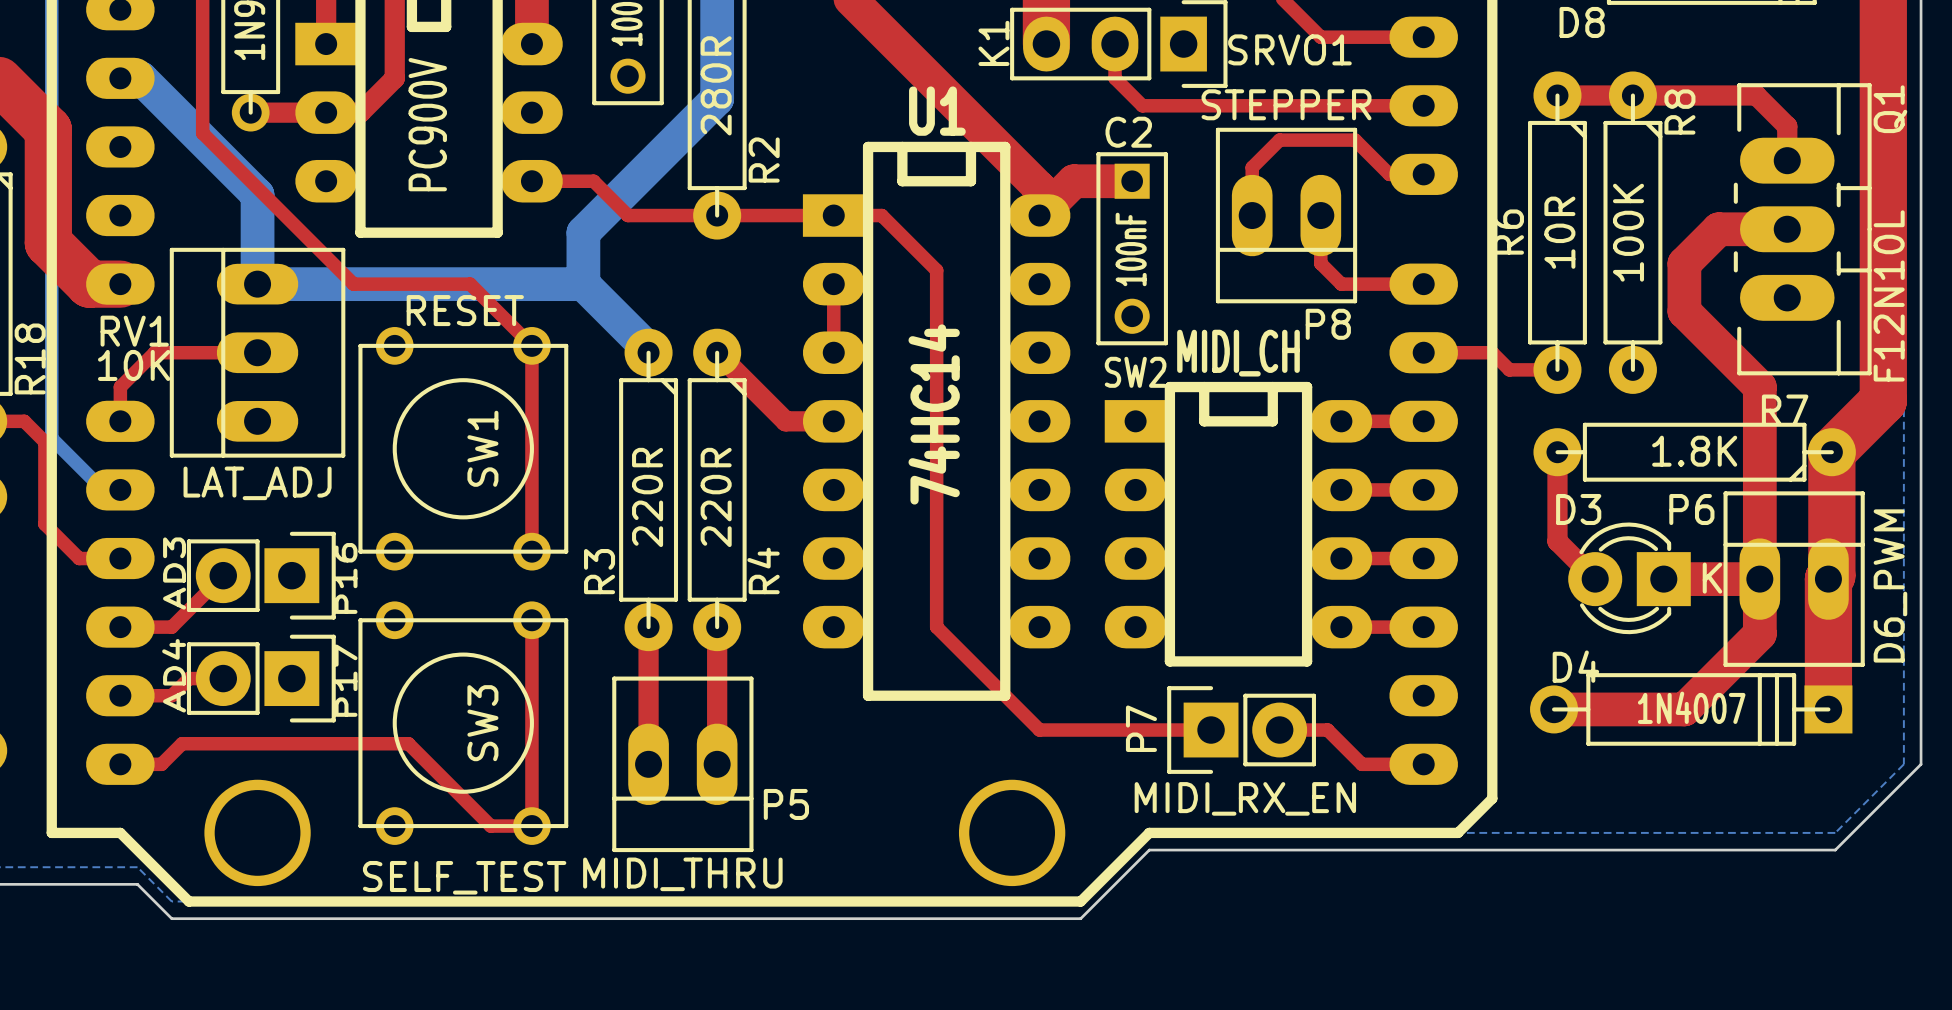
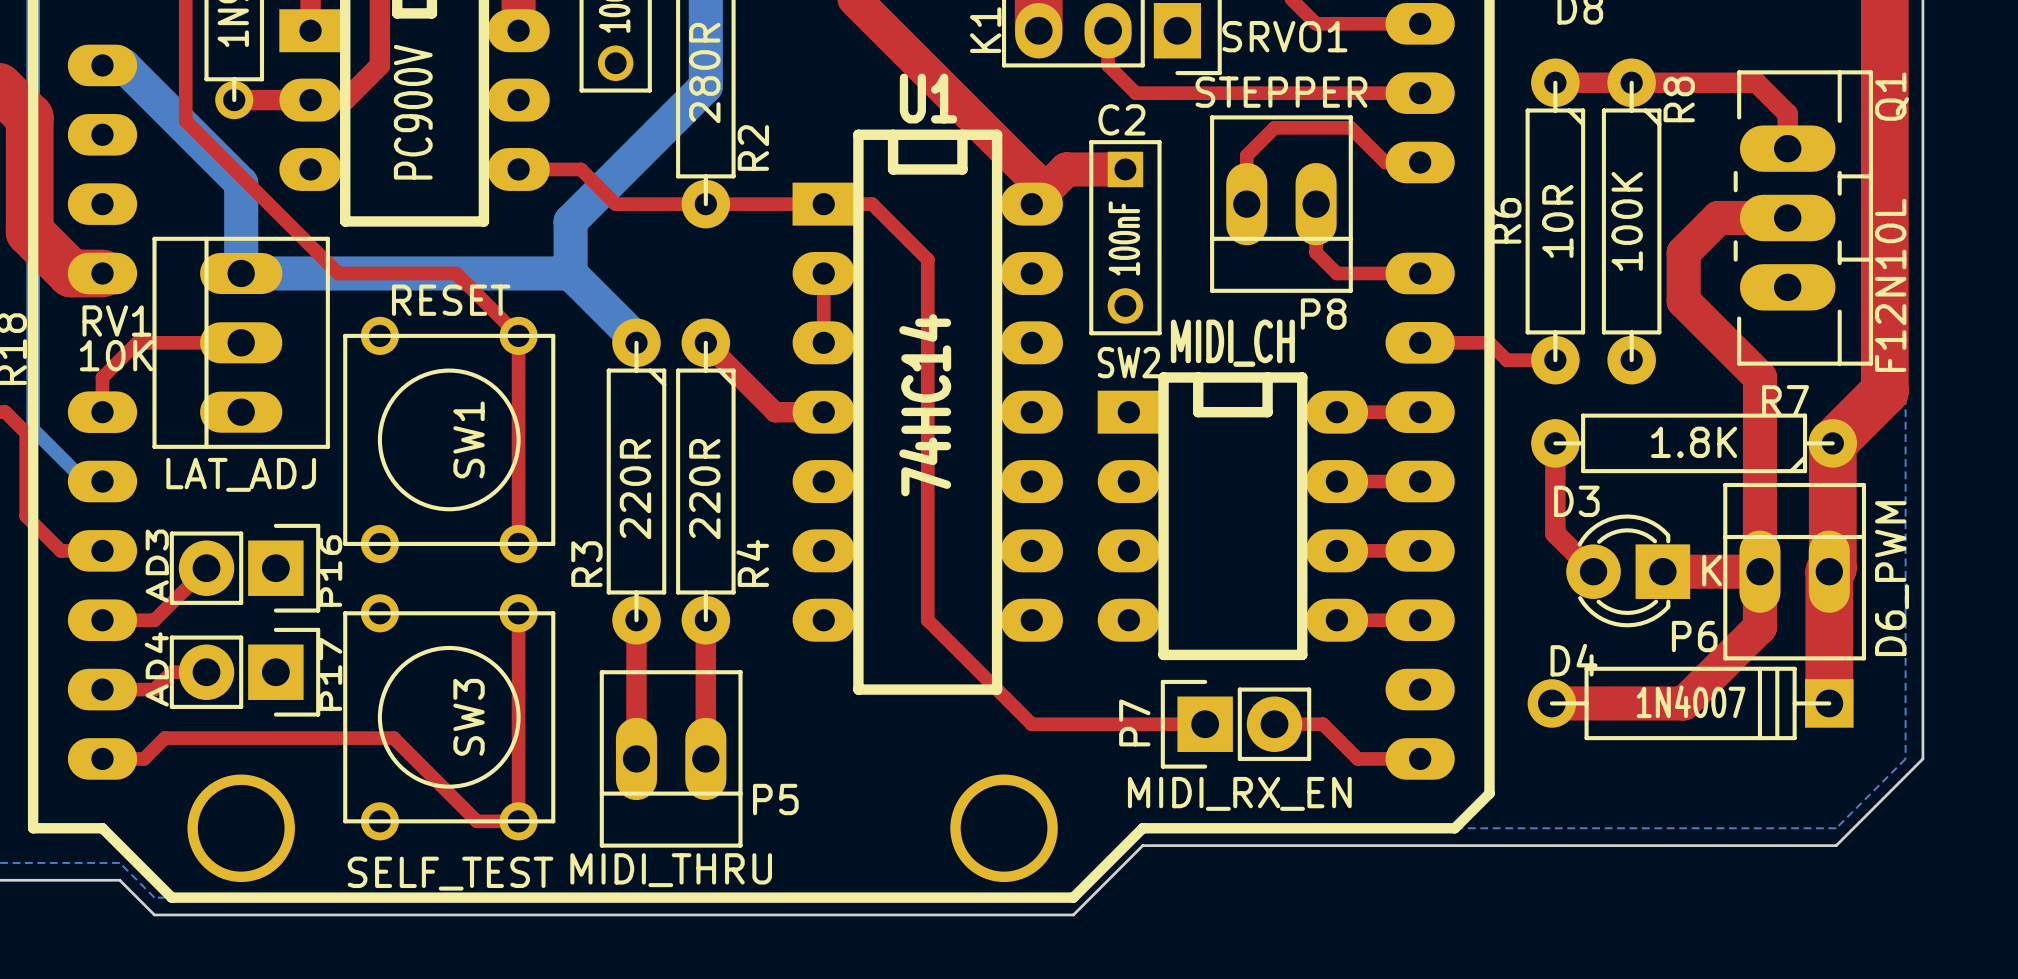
P6 name position: P6 (1691, 509) -> P6 (1694, 636)

